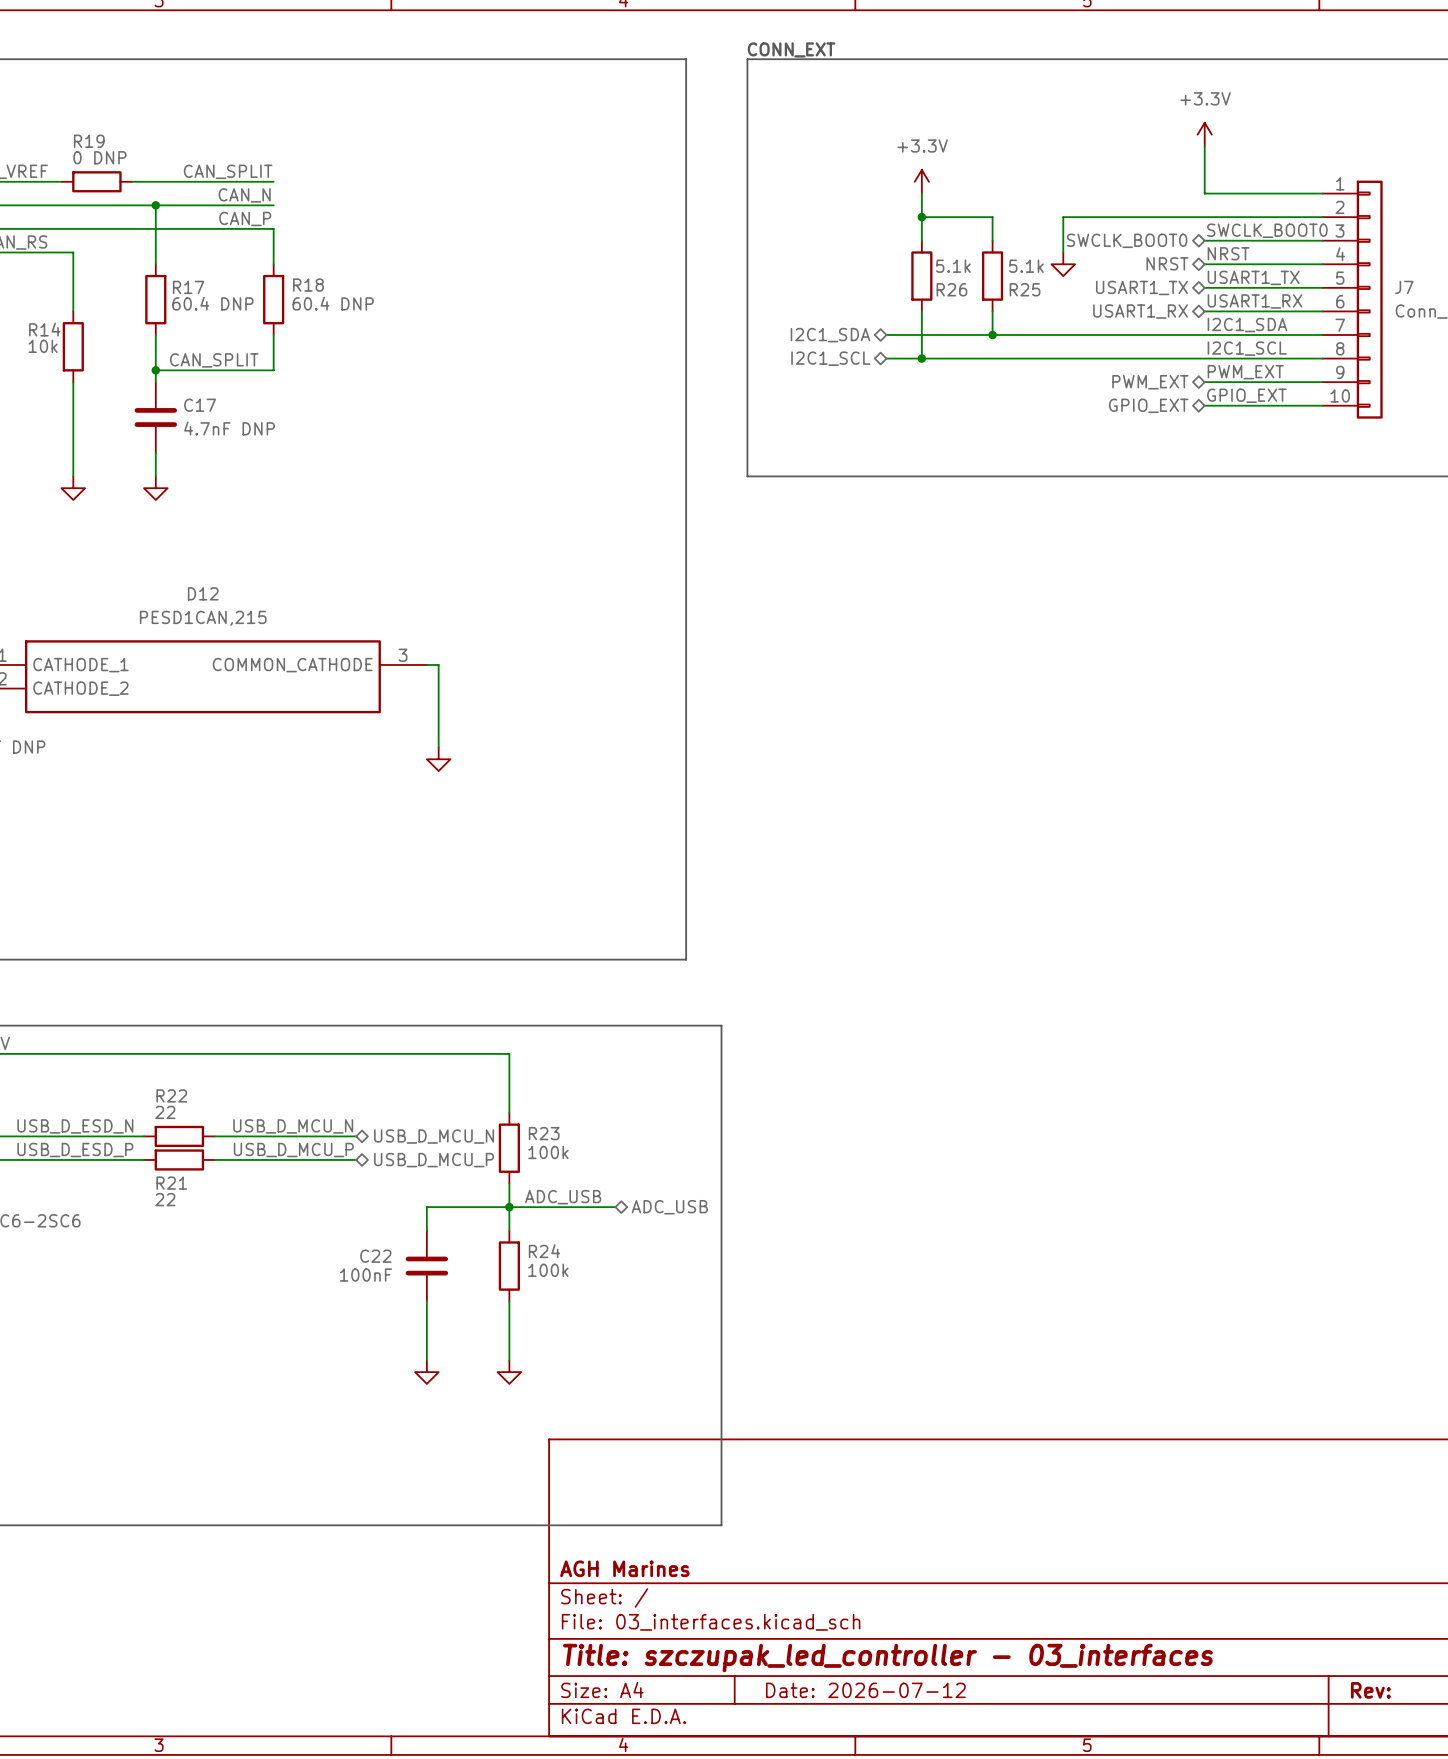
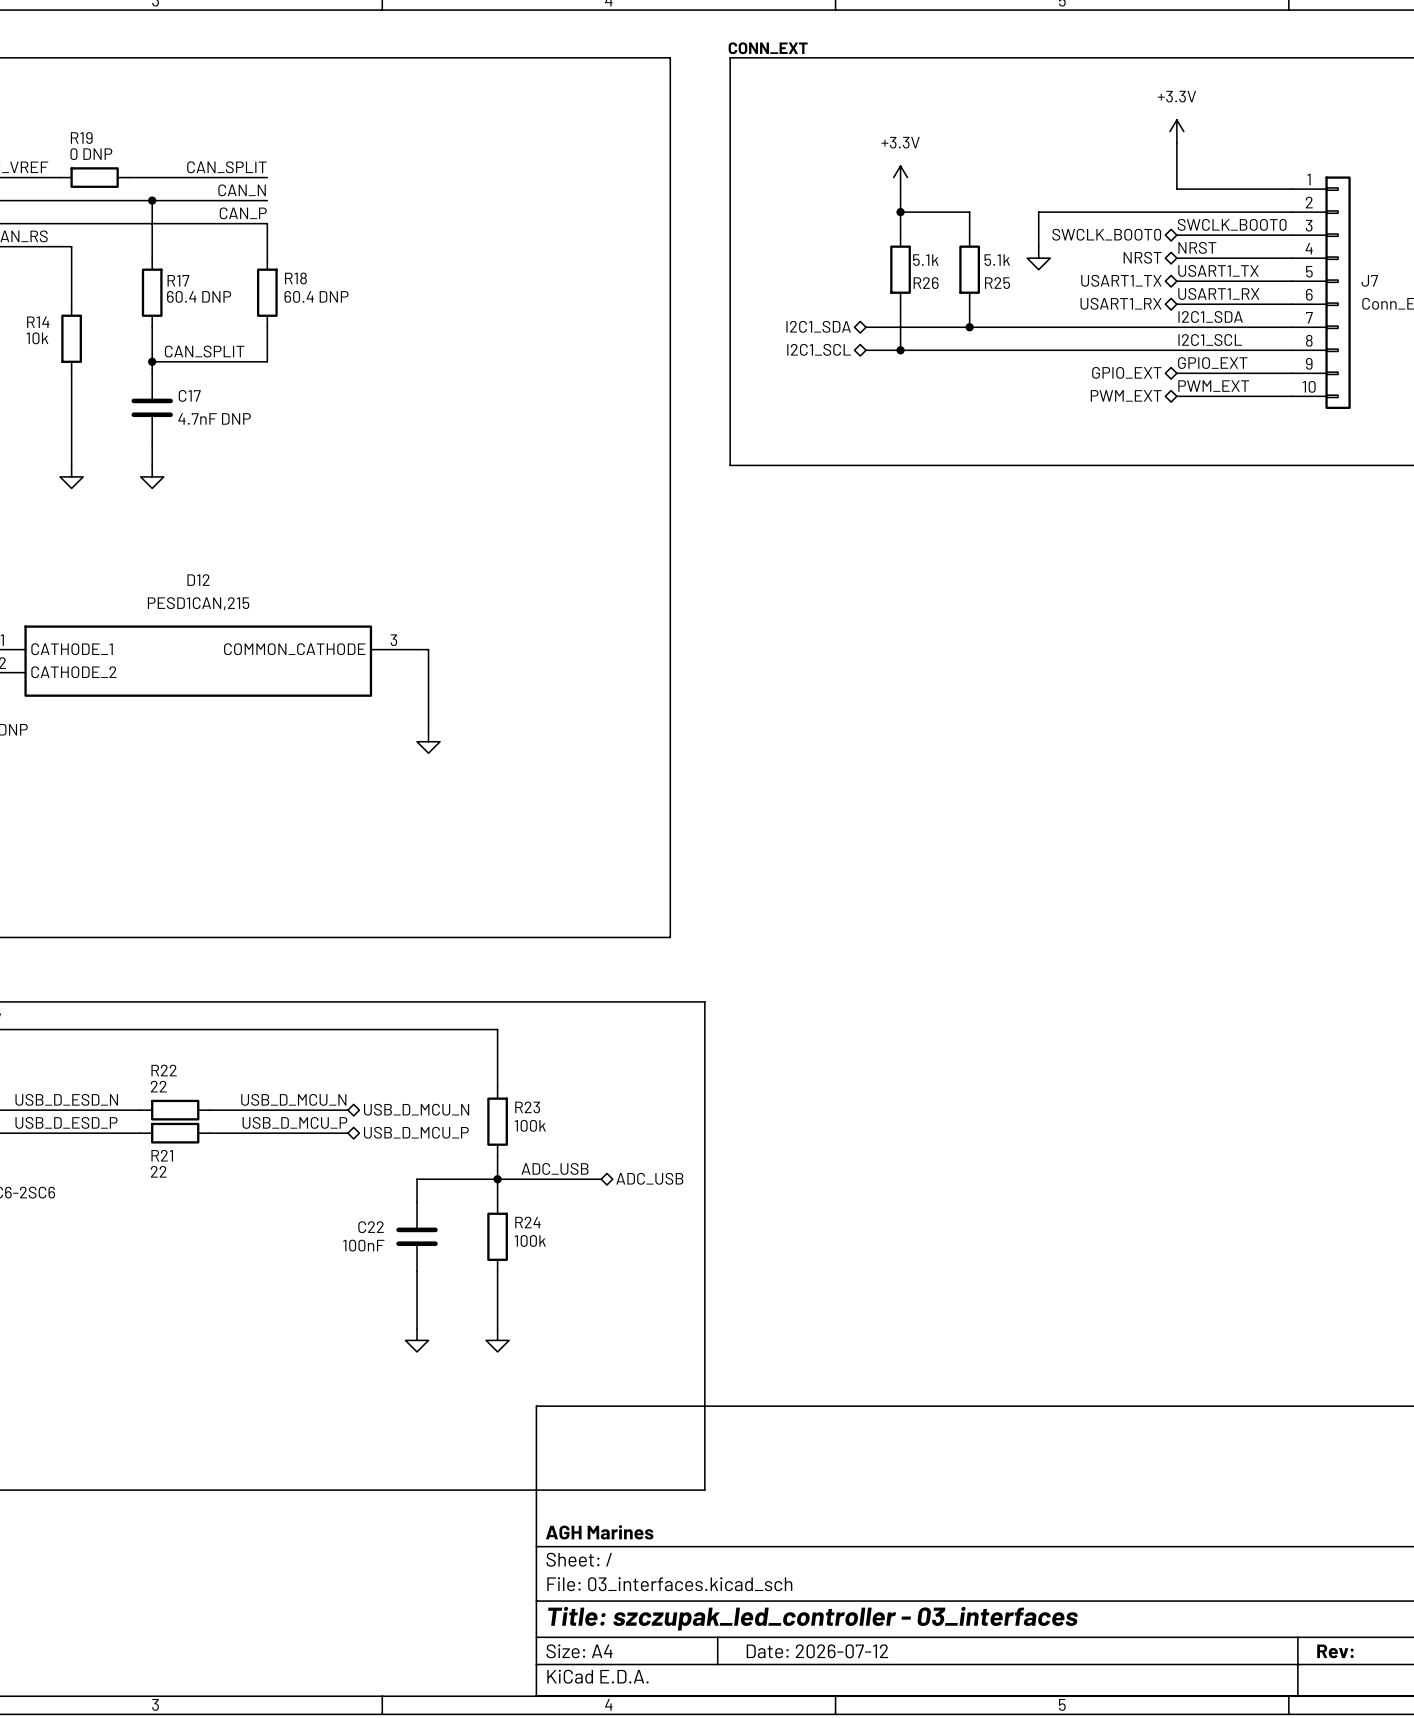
label: PWM_EXT (1245, 372) -> GPIO_EXT (1212, 363)
hierarchical label: PWM_EXT (1150, 382) -> GPIO_EXT (1126, 372)
label: GPIO_EXT (1246, 395) -> PWM_EXT (1213, 386)
hierarchical label: GPIO_EXT (1148, 405) -> PWM_EXT (1126, 395)

